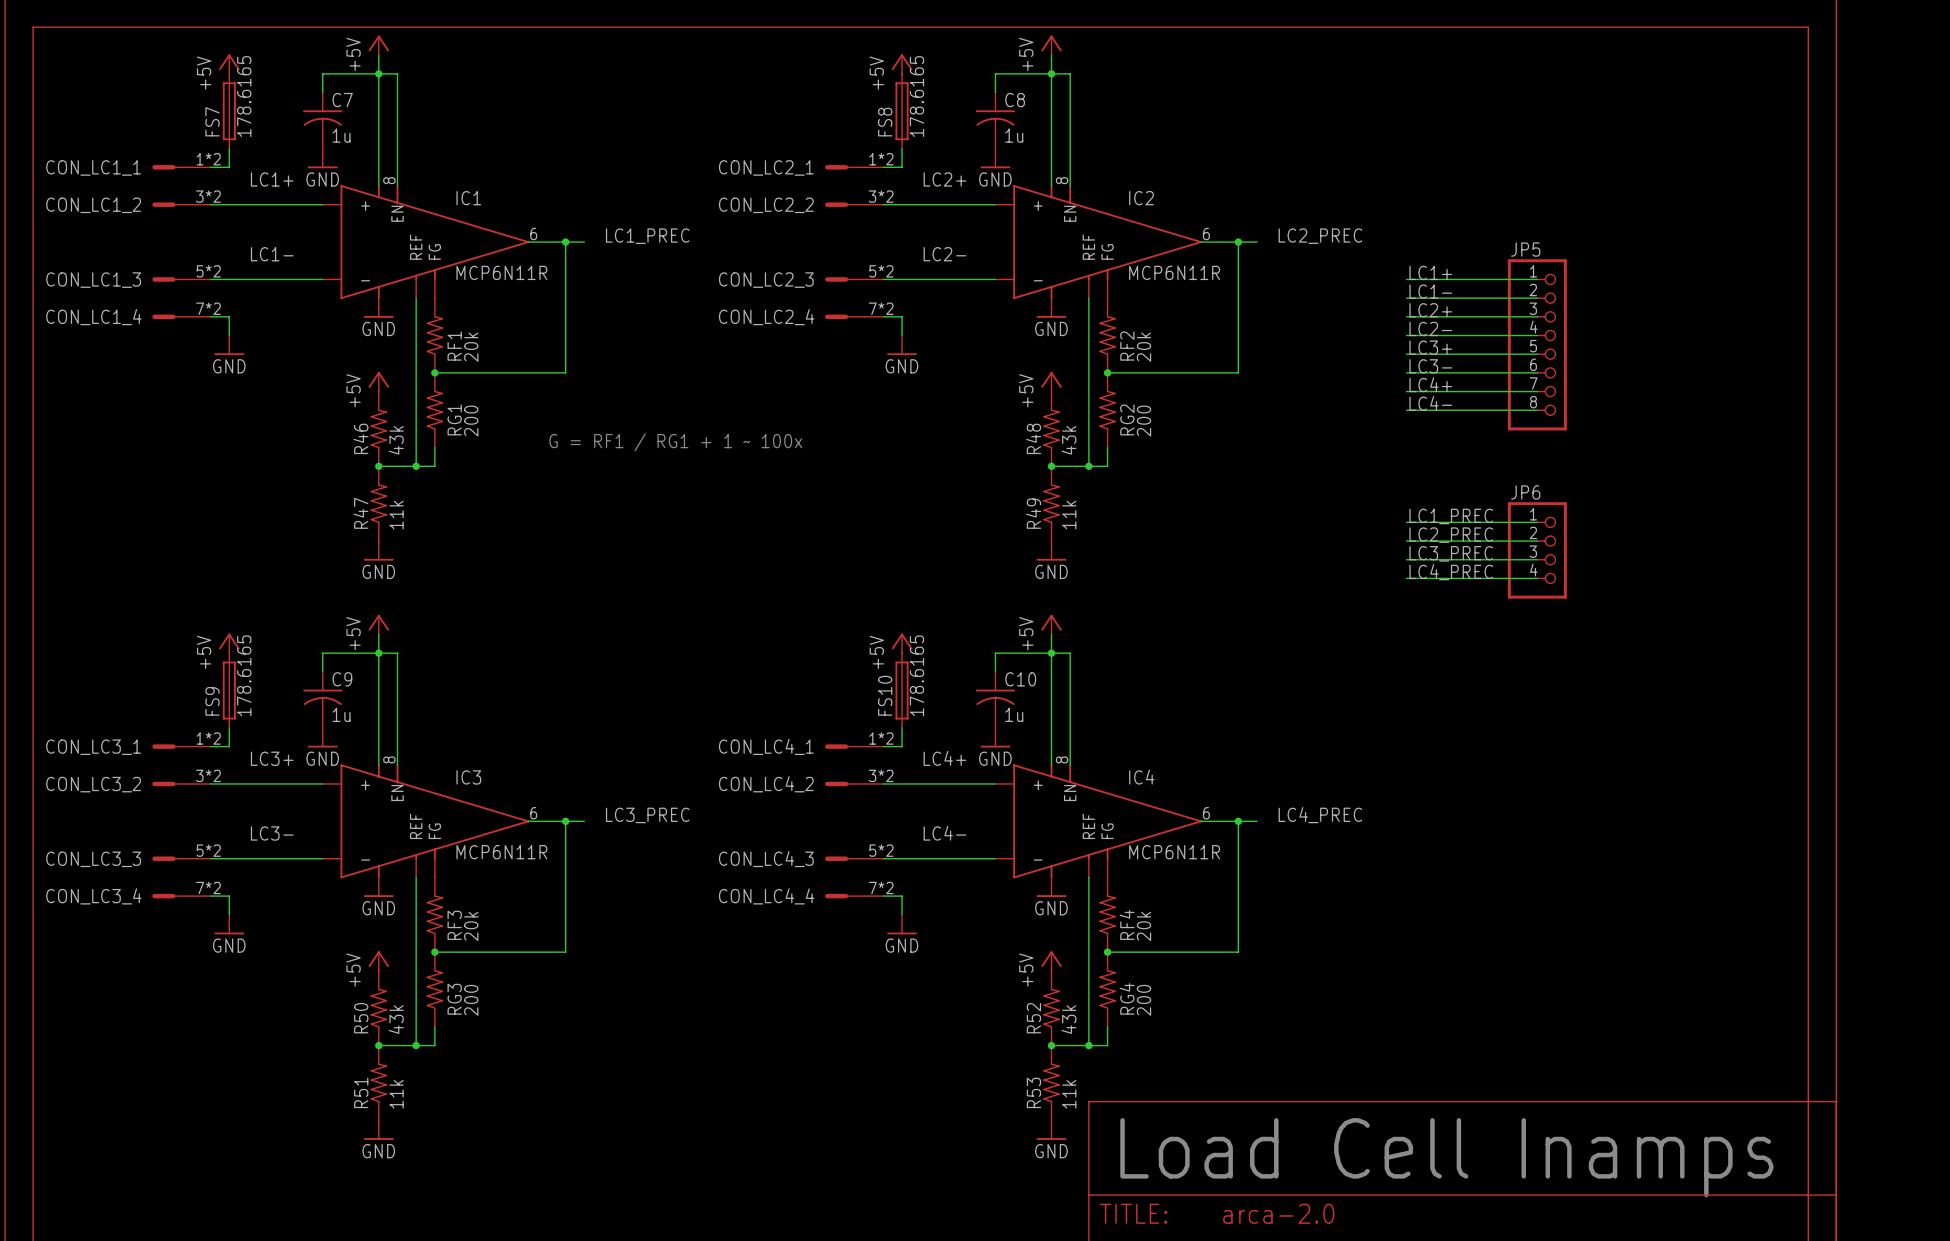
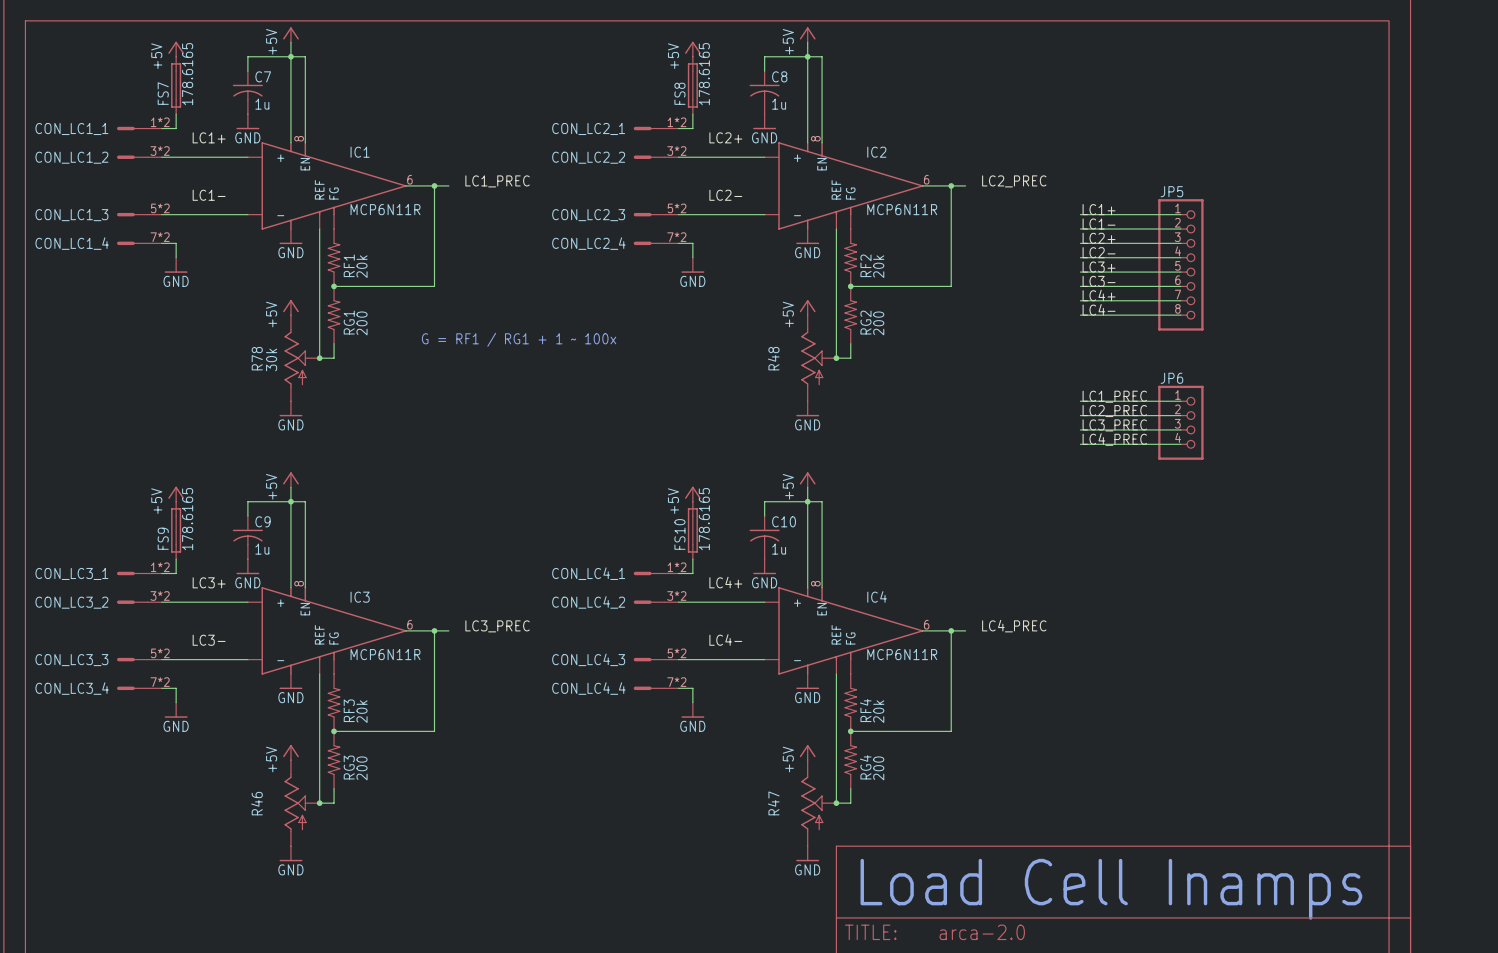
power symbol position: +5V (378, 381) -> +5V (290, 307)
power symbol position: +5V (1051, 381) -> +5V (807, 307)
R46 symbol: [370, 391, 388, 467] -> [284, 760, 320, 847]
R48 symbol: [1043, 391, 1060, 467] -> [801, 315, 837, 402]
R46 name position: R46 (360, 438) -> R46 (257, 803)
R48 name position: R48 (1033, 438) -> R48 (773, 358)
R46 value: 43k (396, 440) -> none
R48 value: 43k (1068, 440) -> none
R47 symbol: [370, 466, 388, 542] -> [801, 760, 837, 847]
junction: (378, 466) -> none
R78: none -> 30k (302, 358)
junction: (1051, 466) -> none
R49: 11k (1051, 503) -> none
R47 name position: R47 (360, 513) -> R47 (773, 803)
R47 value: 11k (396, 515) -> none
power symbol position: GND (378, 550) -> GND (290, 408)
power symbol position: GND (1051, 550) -> GND (807, 408)
power symbol position: +5V (378, 961) -> +5V (290, 752)
power symbol position: +5V (1051, 961) -> +5V (807, 752)
R50: 43k (378, 1008) -> none
R52: 43k (1051, 1008) -> none
junction: (378, 1045) -> none
junction: (1051, 1045) -> none
R51: 11k (378, 1082) -> none
R53: 11k (1051, 1082) -> none
power symbol position: GND (378, 1130) -> GND (290, 853)
power symbol position: GND (1051, 1130) -> GND (807, 853)

